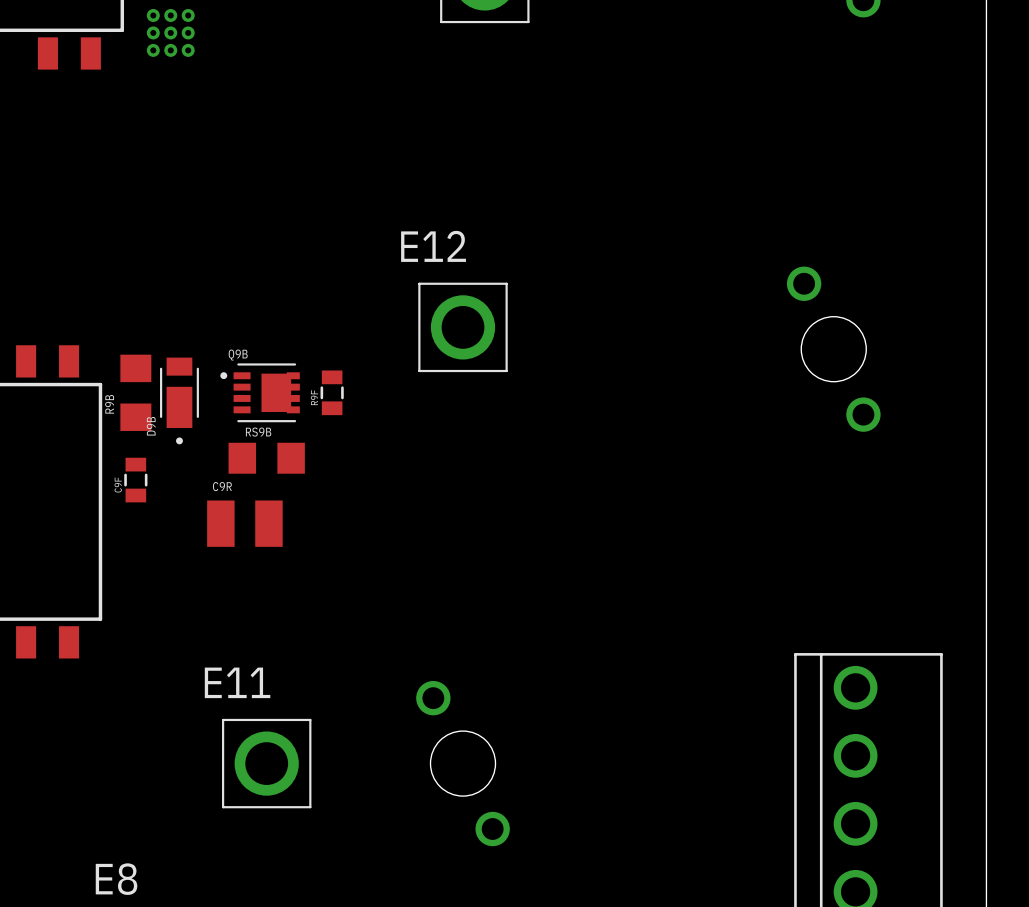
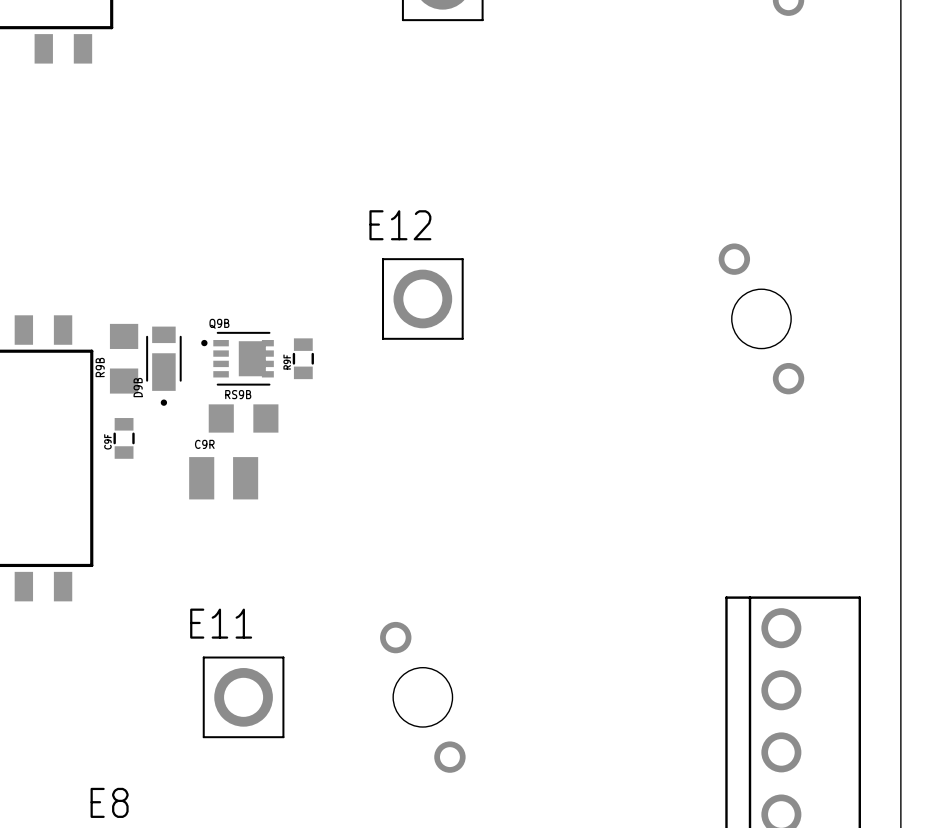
via: (153, 15) -> none
via: (170, 15) -> none
via: (188, 15) -> none
via: (153, 32) -> none
via: (170, 32) -> none
via: (188, 32) -> none
via: (153, 50) -> none
via: (170, 50) -> none
via: (188, 50) -> none

